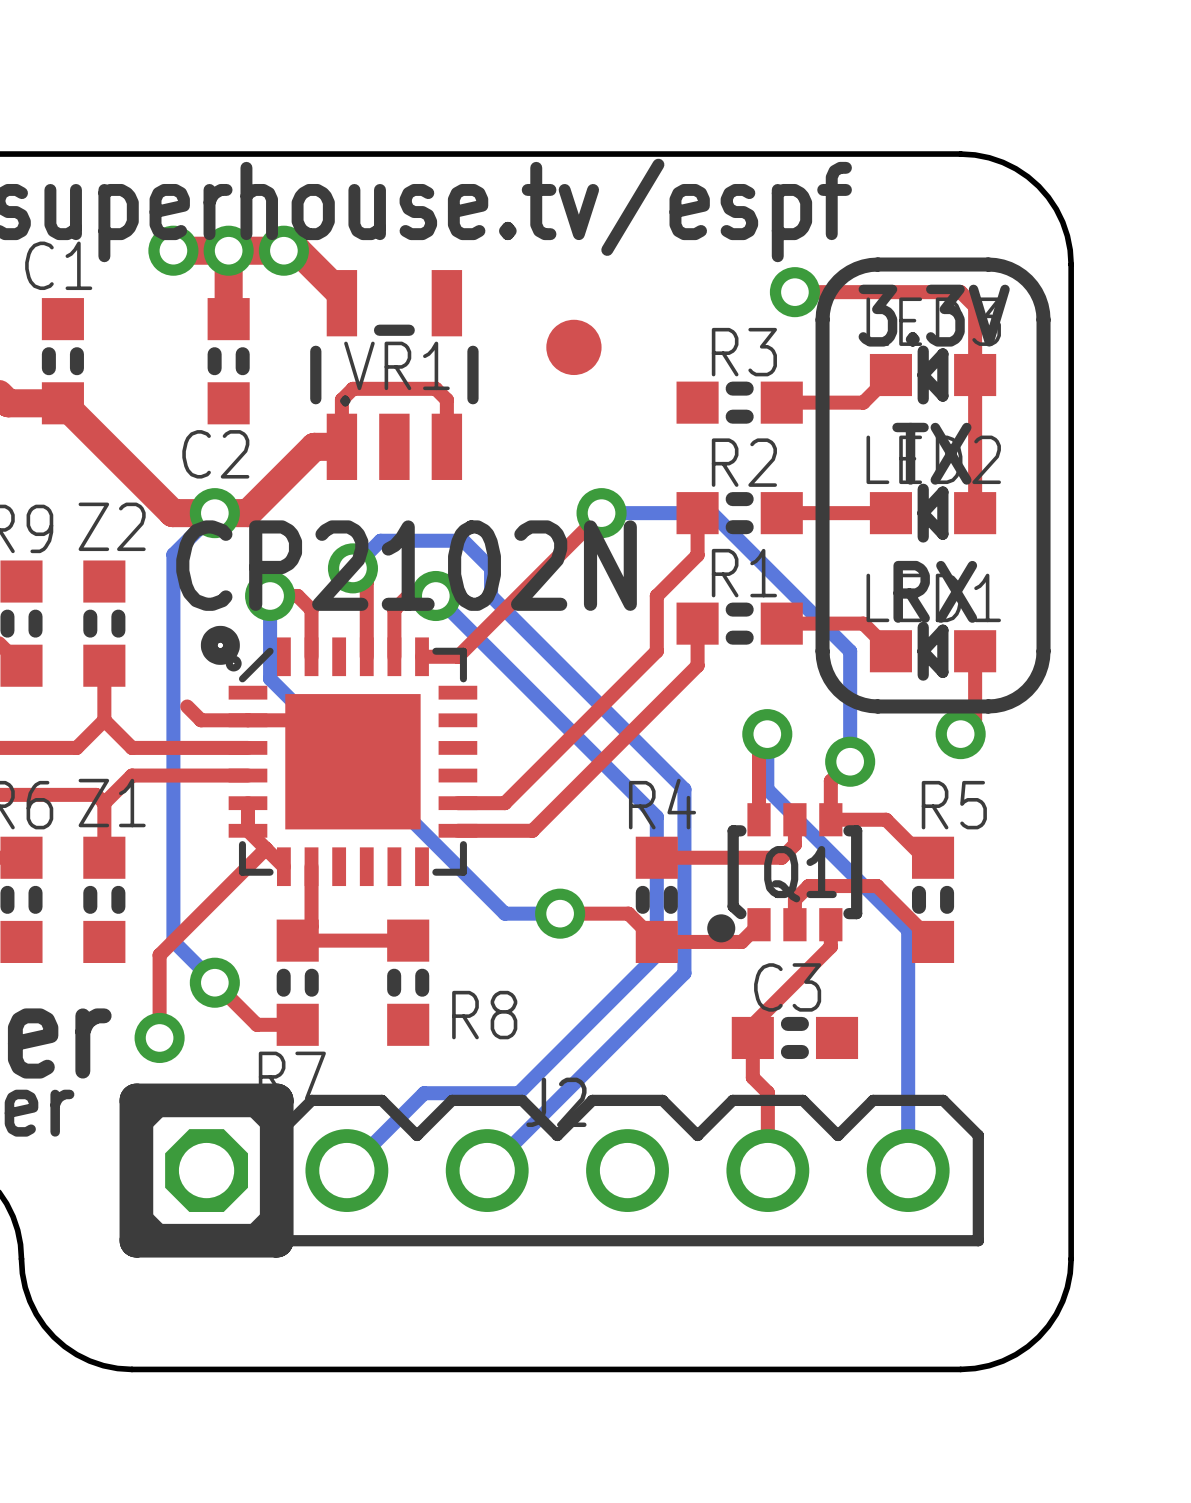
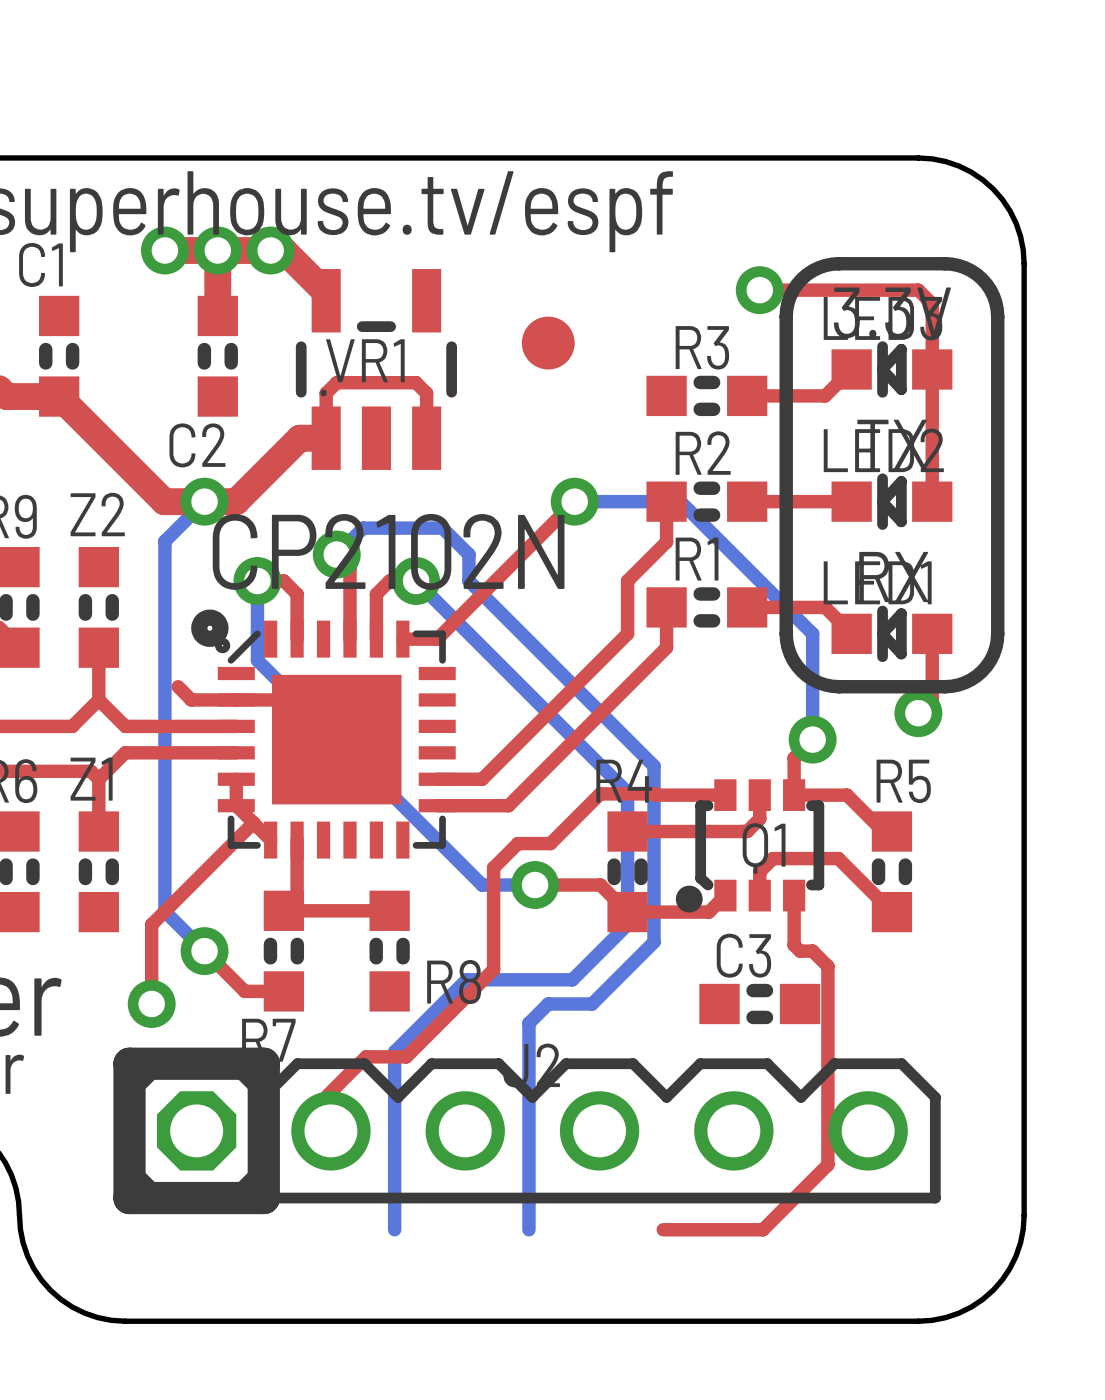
top track: (767, 734) (759, 742) (759, 819) -> (327, 1095) (366, 1056) (406, 1056) (493, 969) (493, 867) (517, 843) (550, 843) (600, 793) (725, 795)
bottom track: (767, 734) (767, 789) (908, 930) (908, 1170) -> none
via: (767, 734) -> none
top track: (830, 946) (752, 1024) (752, 1077) (767, 1092) (767, 1170) -> (794, 916) (794, 945) (800, 951) (812, 951) (827, 966) (827, 1164) (762, 1229) (663, 1229)
bottom track: (599, 1012) (573, 1037) -> (592, 1003) (548, 1003)
bottom track: none -> (572, 979) (466, 979) (394, 1051) (394, 1229)
bottom track: (619, 1037) (487, 1170) -> none
bottom track: (553, 1058) (518, 1093) (424, 1093) (346, 1170) -> (528, 1023) (528, 1229)

